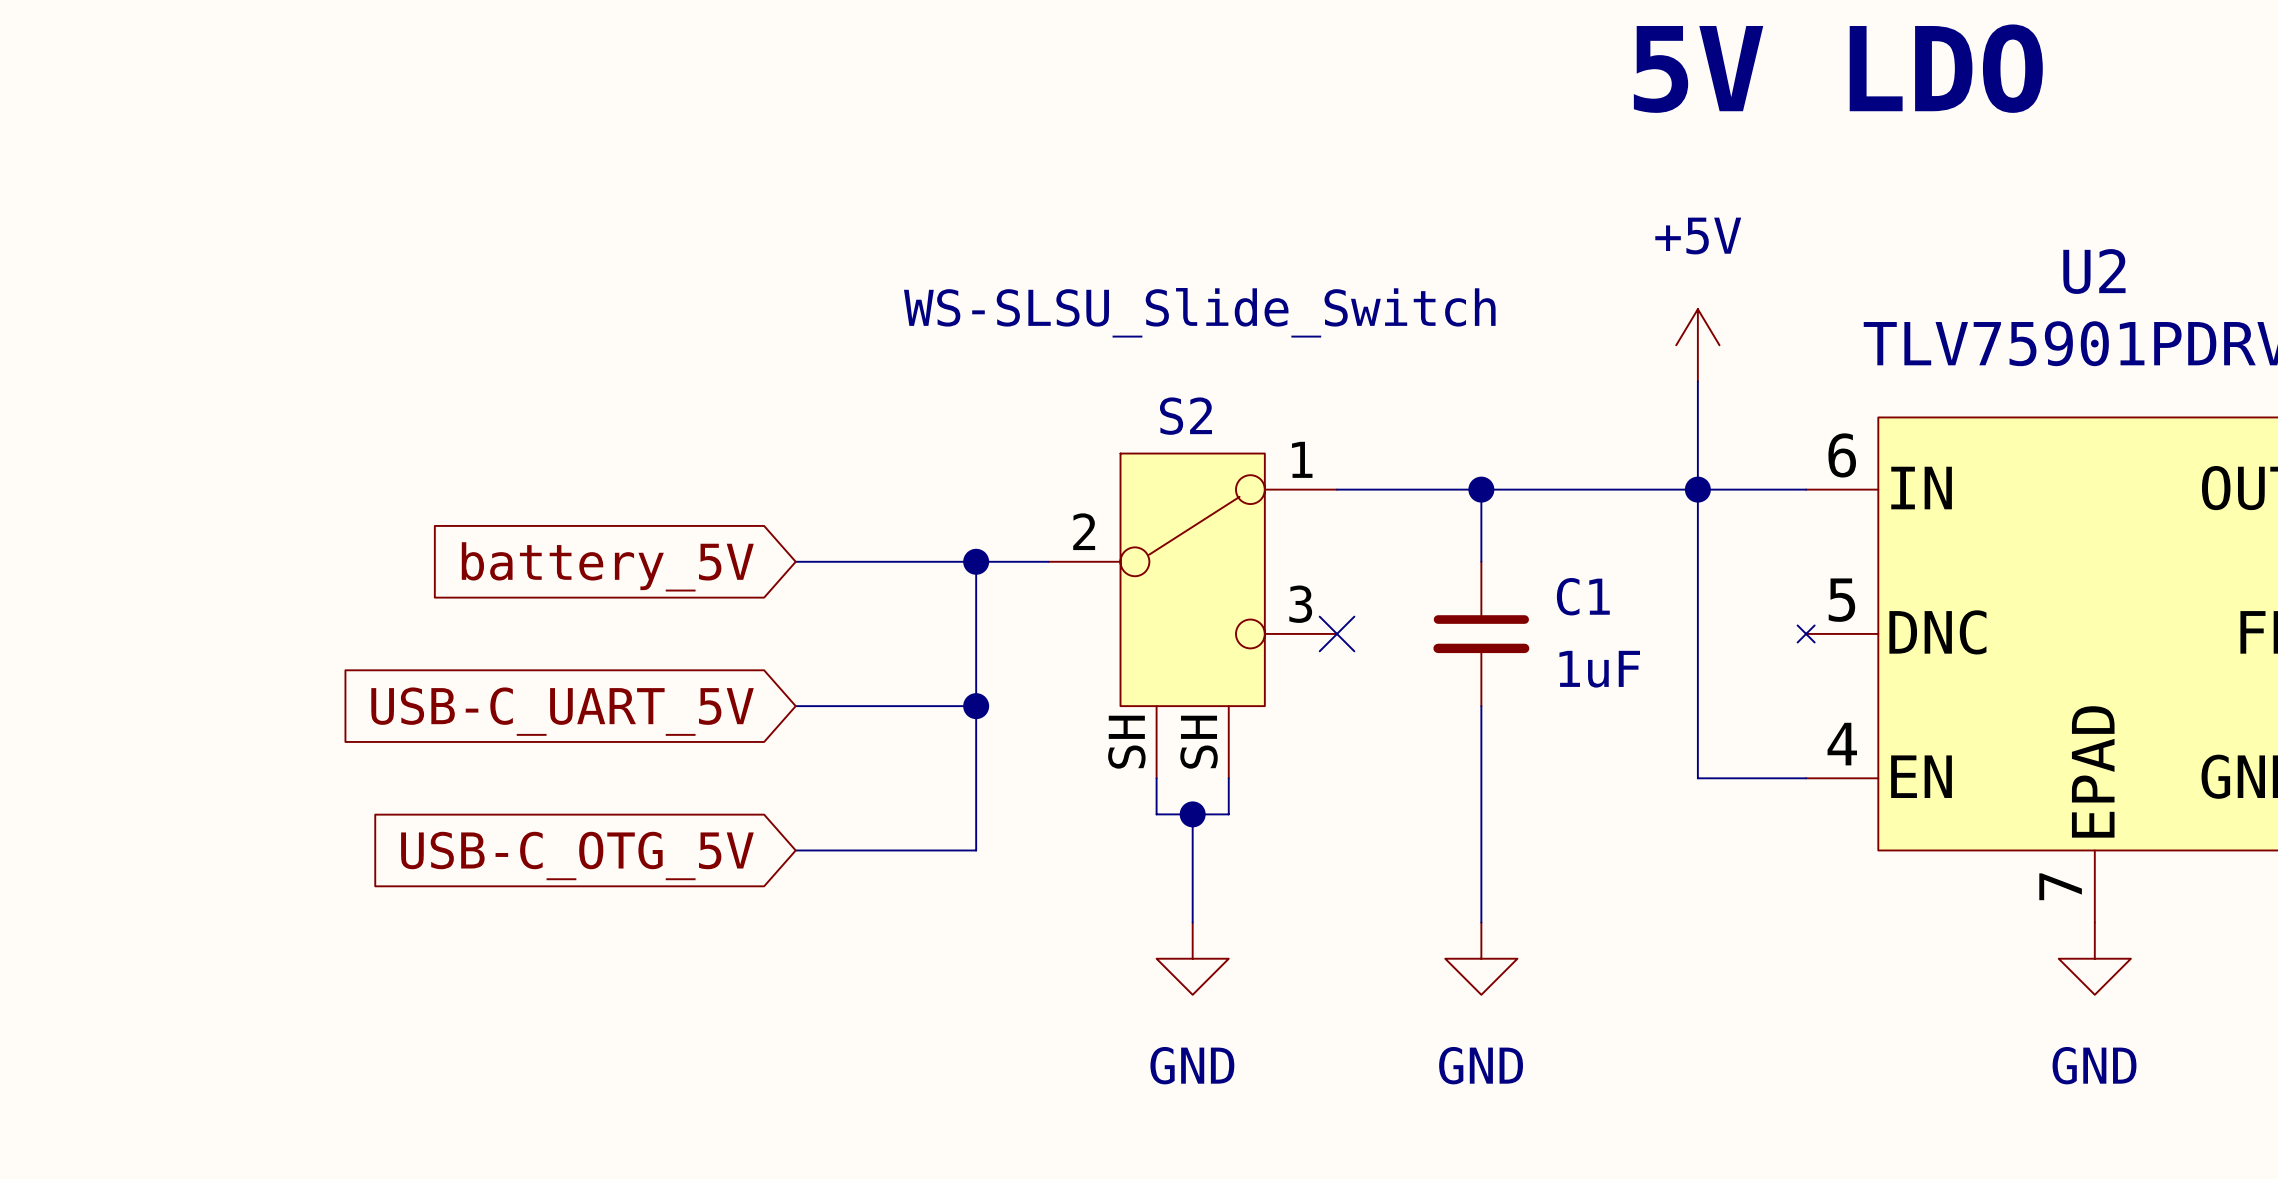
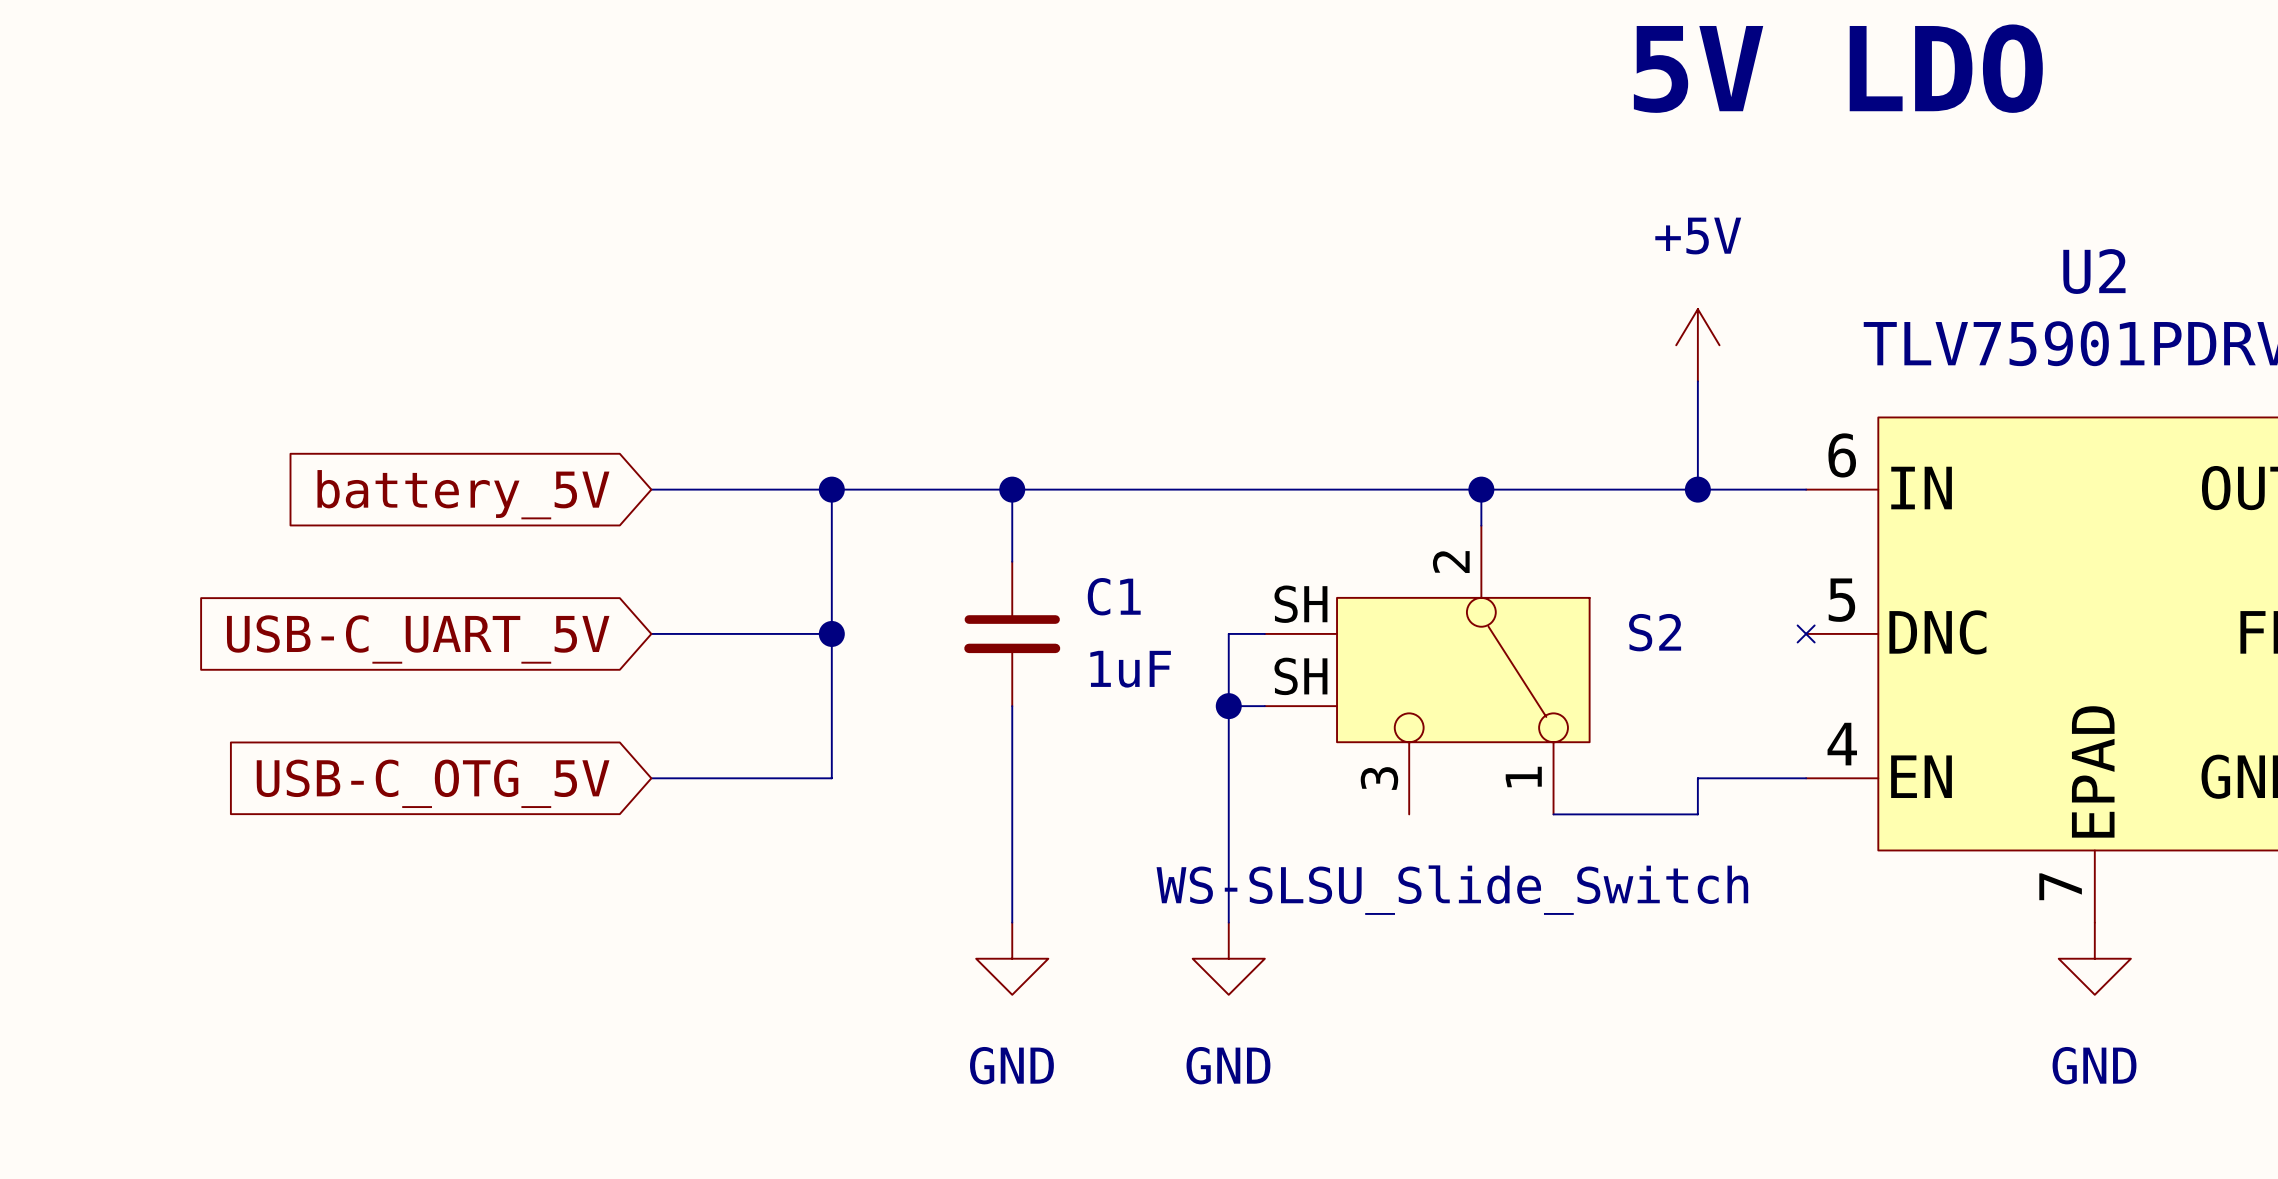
S2 value position: WS-SLSU_Slide_Switch (1199, 312) -> WS-SLSU_Slide_Switch (1452, 890)
S2 name position: S2 (1185, 416) -> S2 (1655, 632)
wire: none -> (651, 489) (1337, 489)
junction: none -> (831, 489)
wire: none -> (1012, 489) (1012, 561)
junction: none -> (1012, 489)
wire: (1697, 489) (1697, 778) -> (1553, 814) (1697, 814) (1697, 778)
wire: (795, 561) (1048, 561) -> none
wire: (976, 561) (976, 850) (795, 850) -> (831, 489) (831, 778) (651, 778)
junction: (976, 561) -> none
global label position: battery_5V (607, 566) -> battery_5V (463, 494)
S2 rotation: 0° (1192, 579) -> 90° clockwise (1463, 670)
S2 position: (1192, 615) -> (1427, 670)
junction: none -> (831, 633)
no-connect mark: (1337, 633) -> none
C1 position: (1481, 633) -> (1012, 633)
wire: (795, 706) (976, 706) -> (651, 633) (831, 633)
junction: (976, 706) -> none
wire: (1481, 706) (1481, 922) -> (1012, 706) (1012, 922)
global label position: USB-C_UART_5V (562, 711) -> USB-C_UART_5V (418, 639)
wire: (1156, 778) (1156, 814) (1228, 814) -> (1228, 922) (1228, 814)
wire: (1192, 814) (1192, 922) -> none
junction position: (1192, 814) -> (1228, 706)
global label position: USB-C_OTG_5V (577, 855) -> USB-C_OTG_5V (433, 783)
power symbol: none -> GND (1012, 958)
power symbol position: GND (1192, 958) -> GND (1228, 958)
power symbol: GND (1481, 958) -> none

